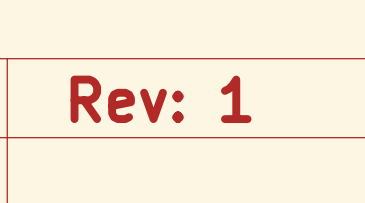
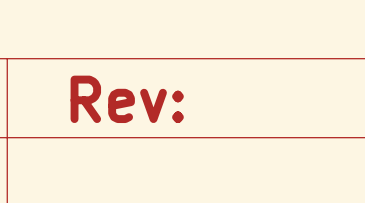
title block: Rev: 1 (161, 99) -> Rev: (127, 99)

